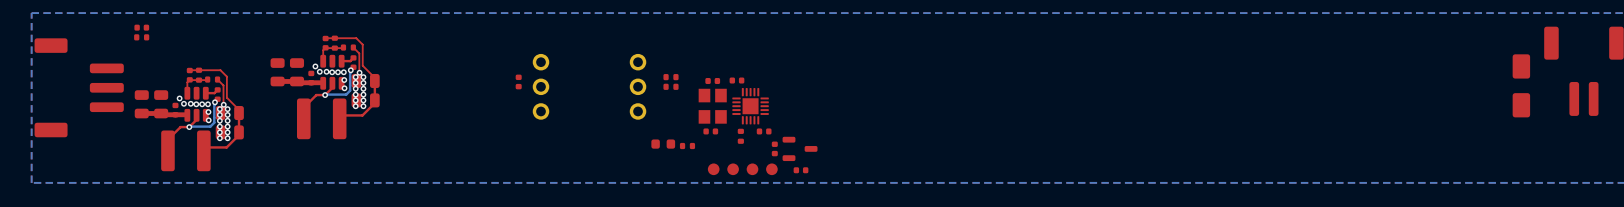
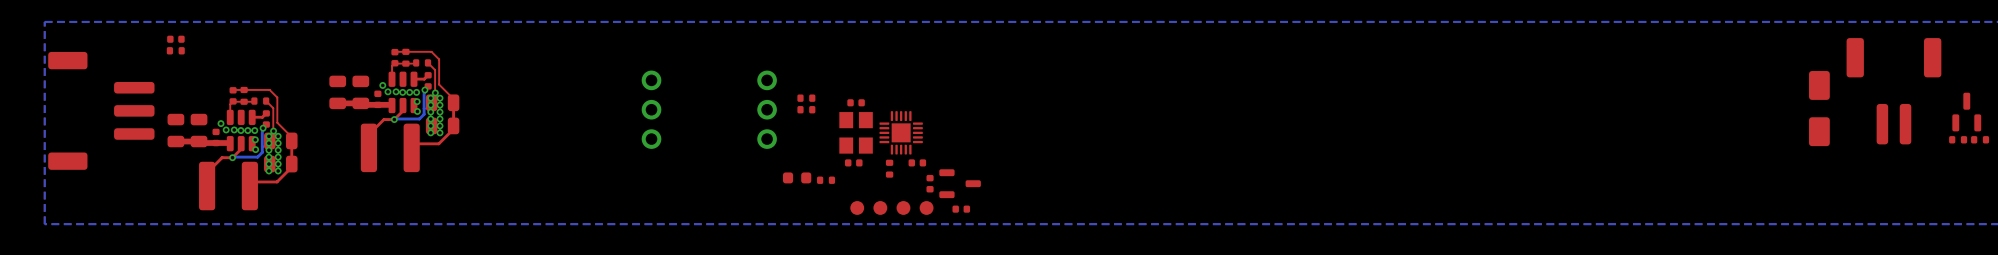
part: (736, 80) -> none
part: (518, 81) -> none

